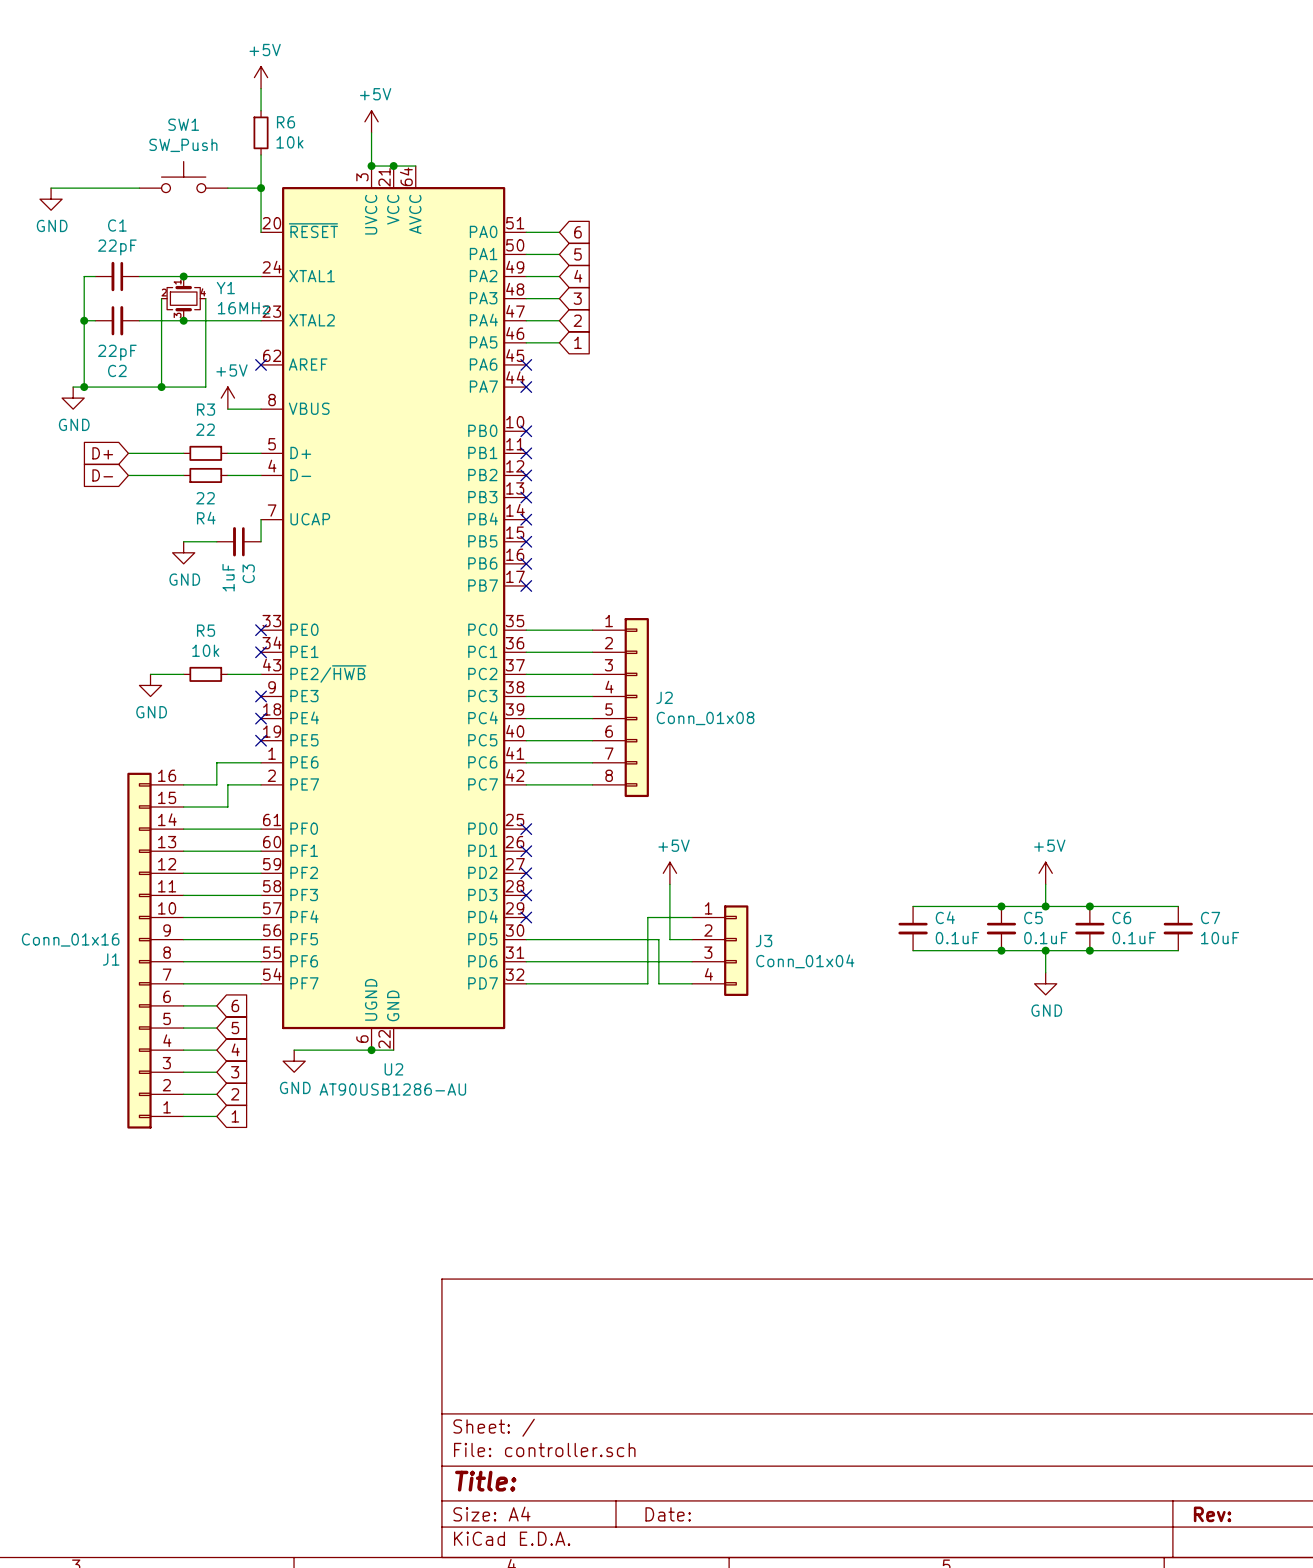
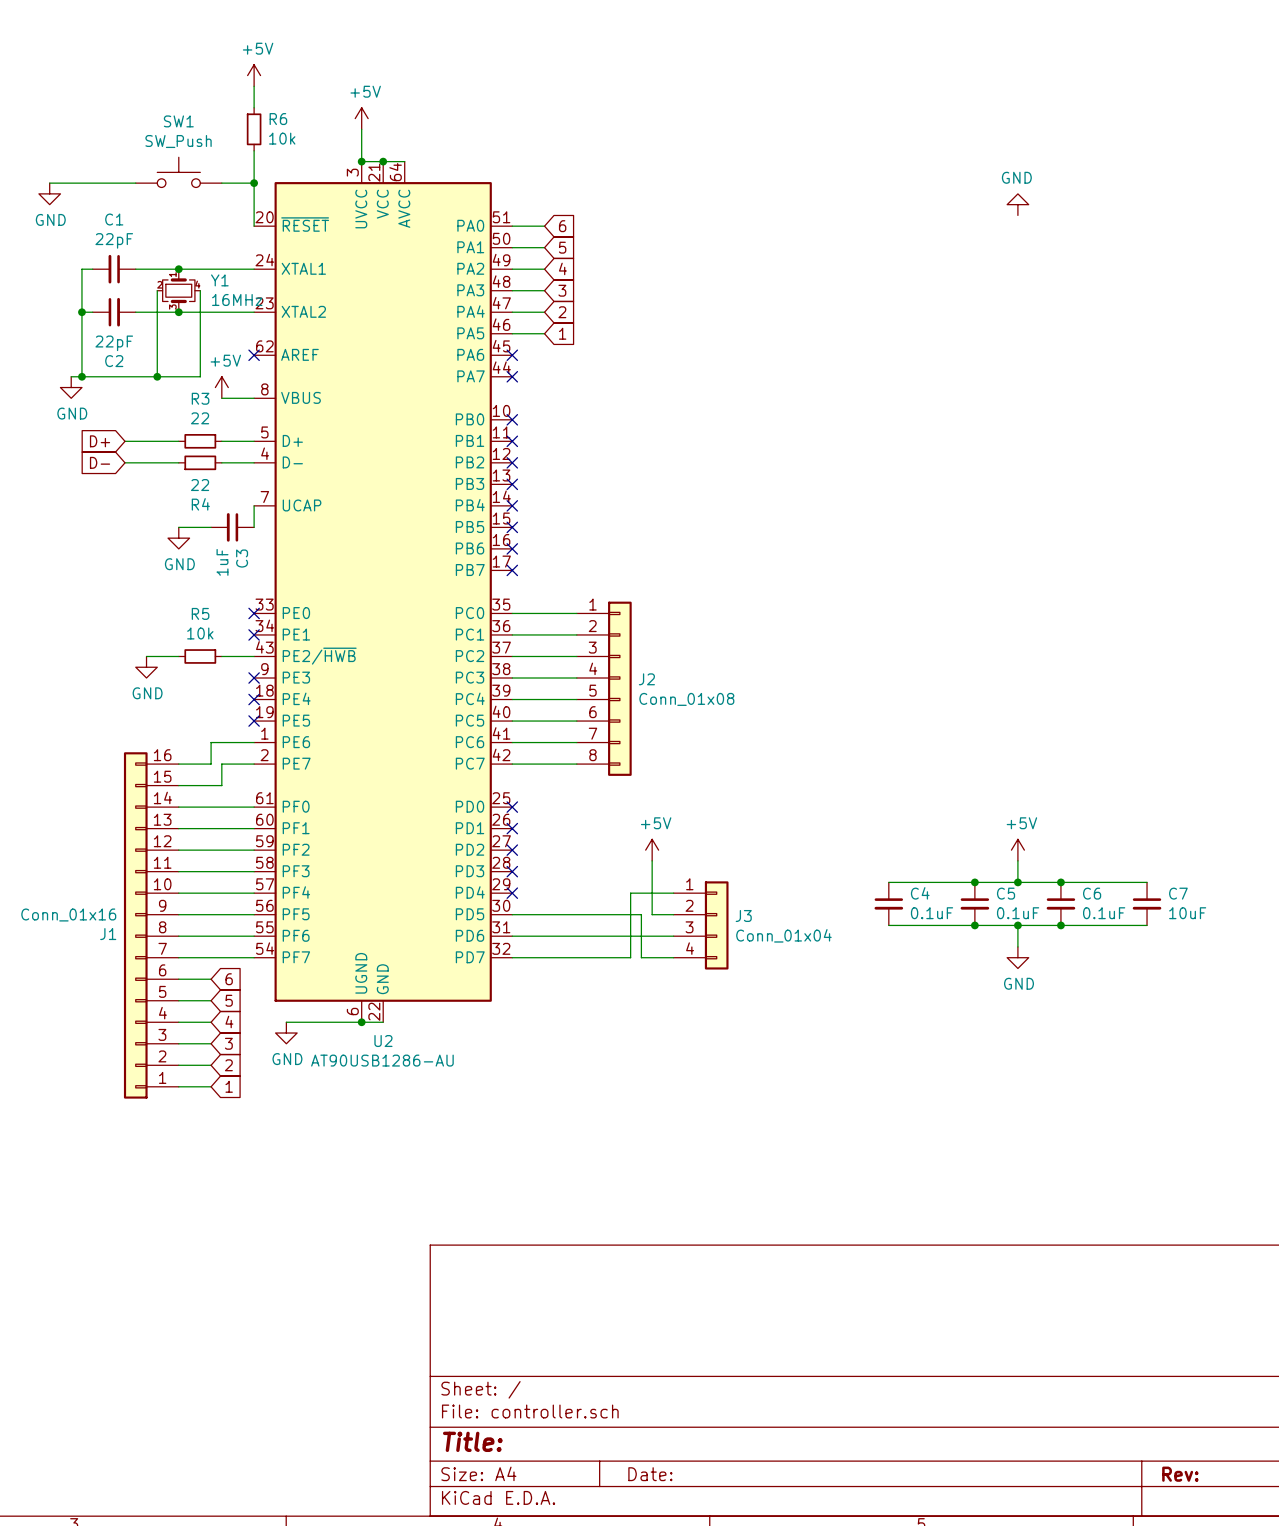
power symbol: none -> GND (1017, 204)

